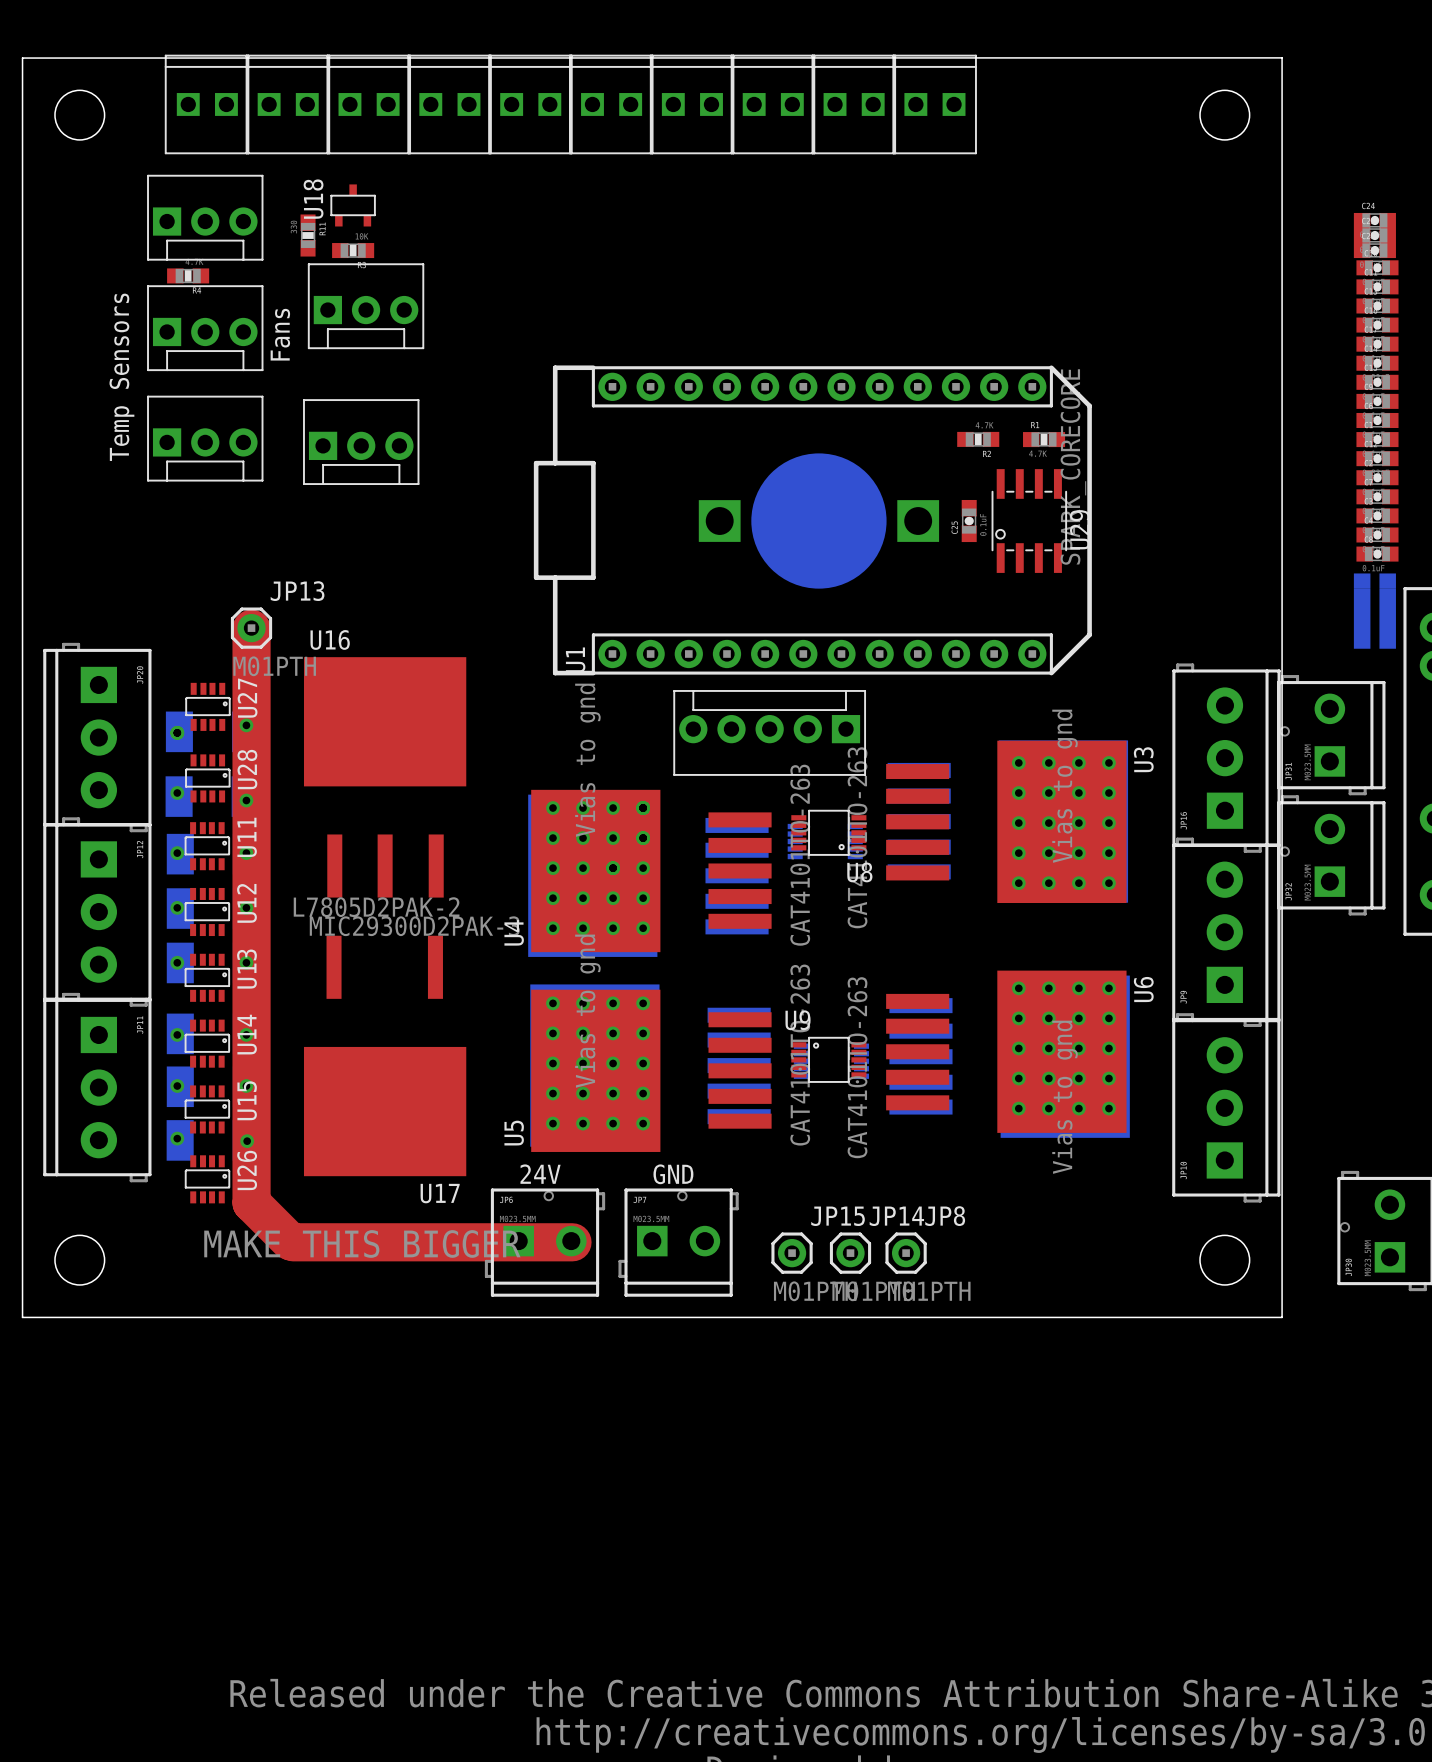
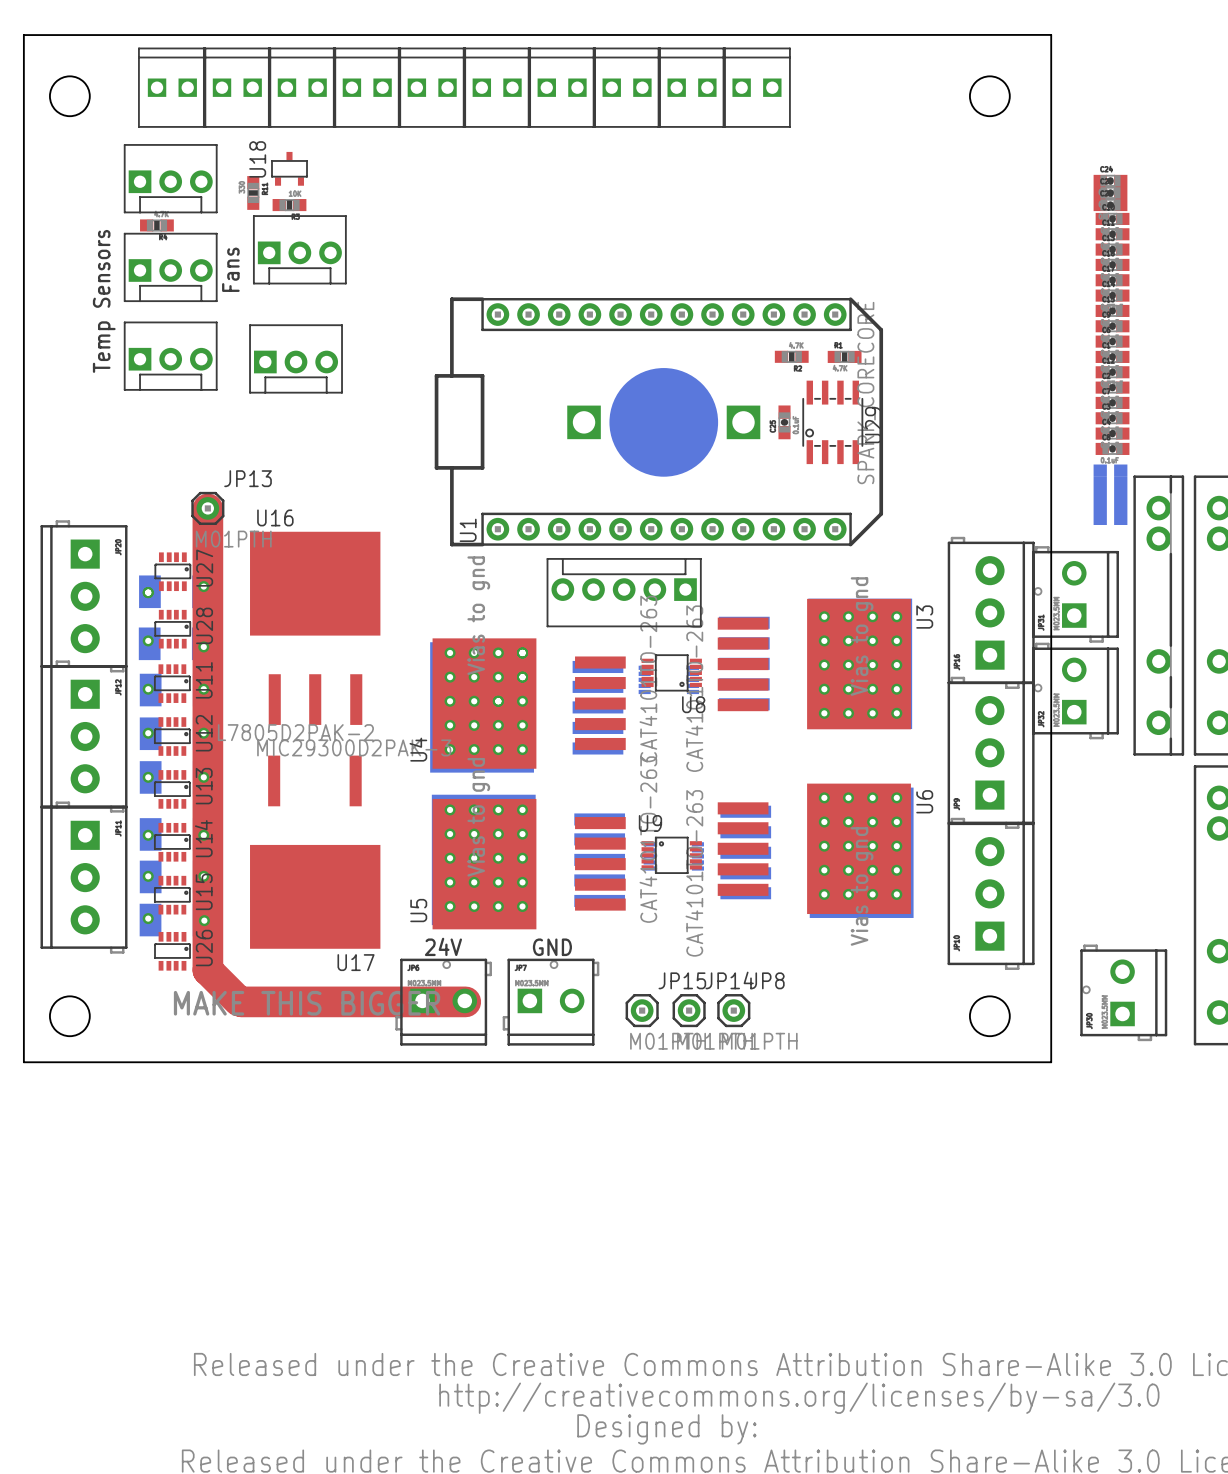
board edge: (22, 58) (1282, 57) (1282, 1317) -> (23, 50) (23, 35) (1051, 34) (1051, 1062) (1035, 1062)

